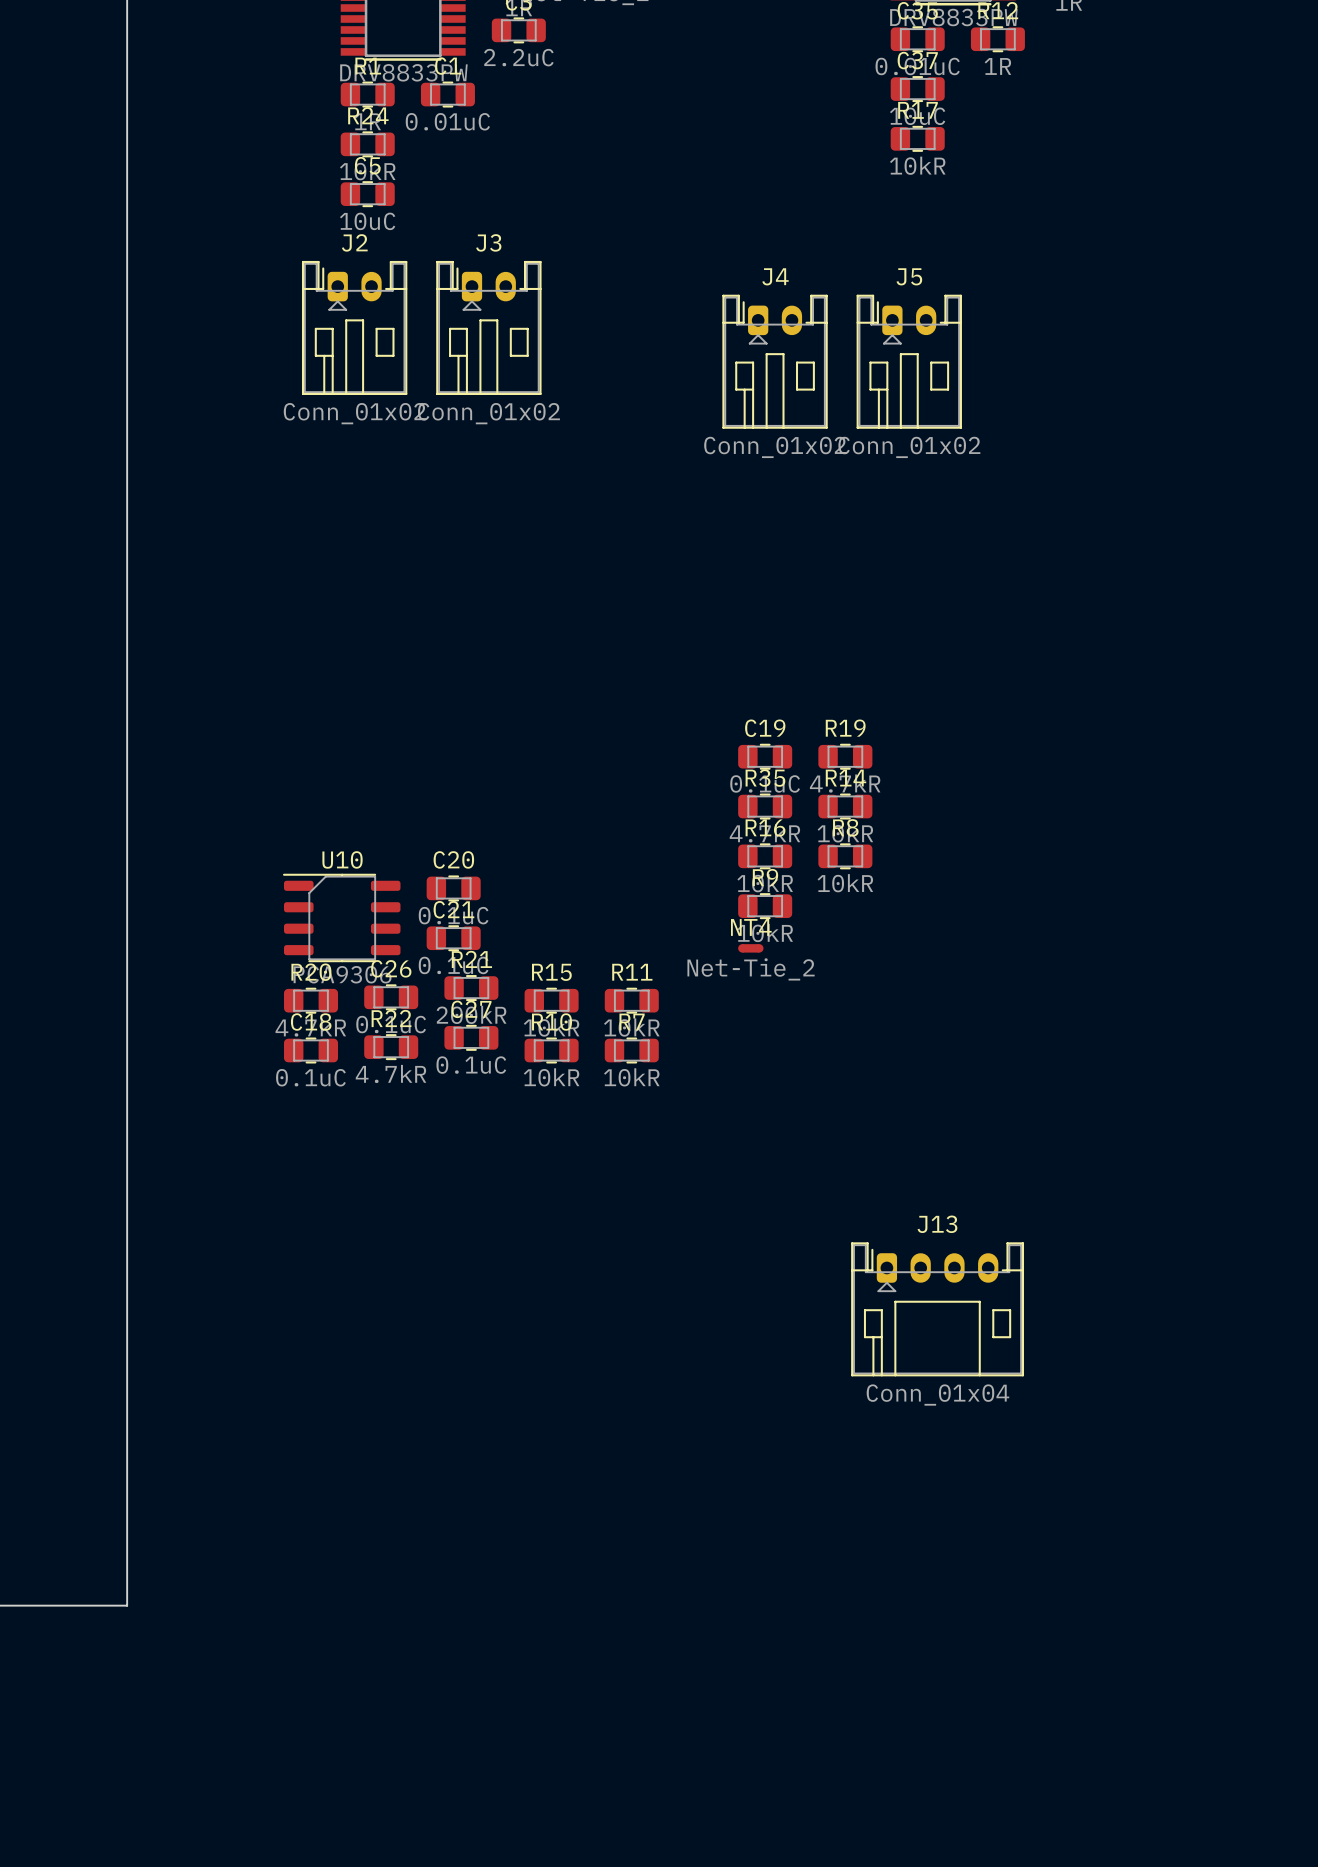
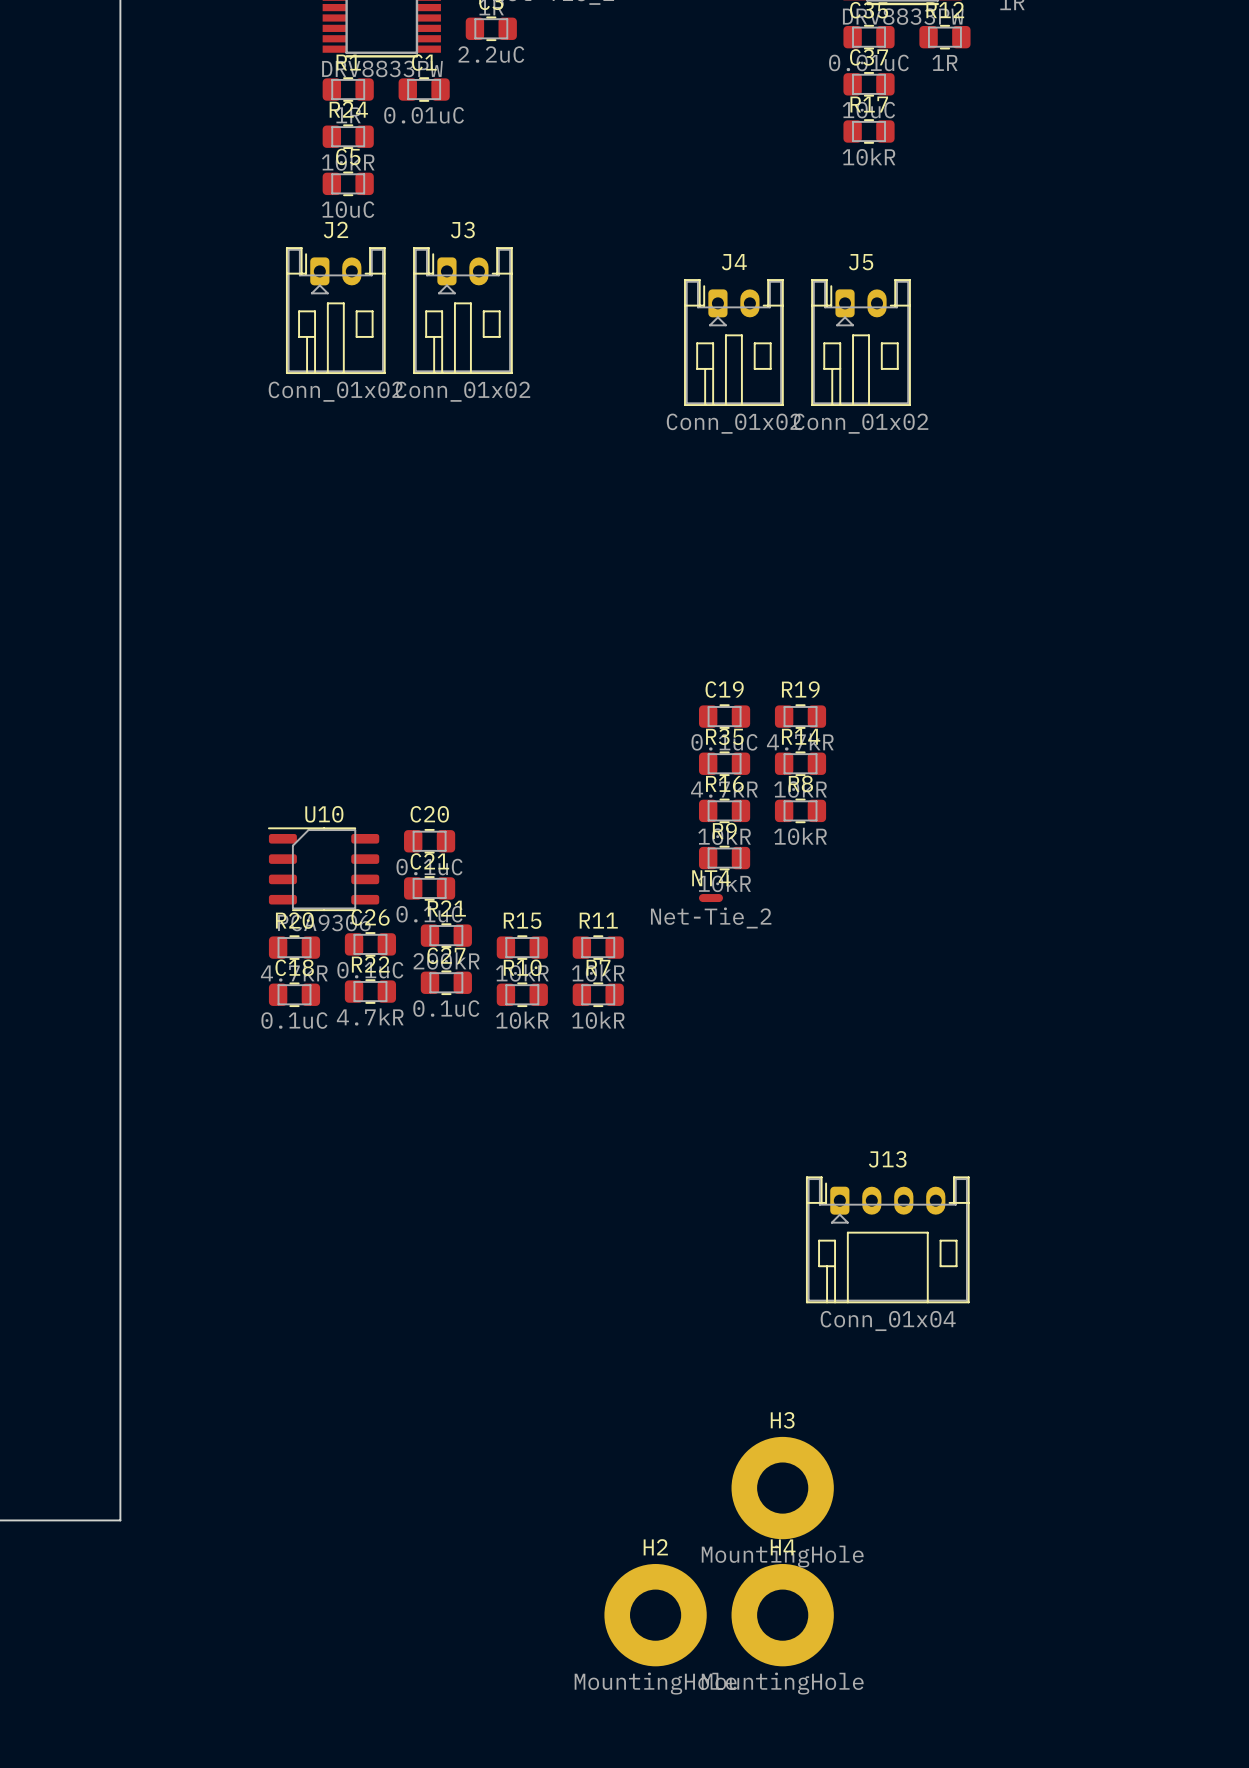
H3: none -> MountingHole (782, 1488)
H2: none -> MountingHole (655, 1615)
H4: none -> MountingHole (782, 1615)

